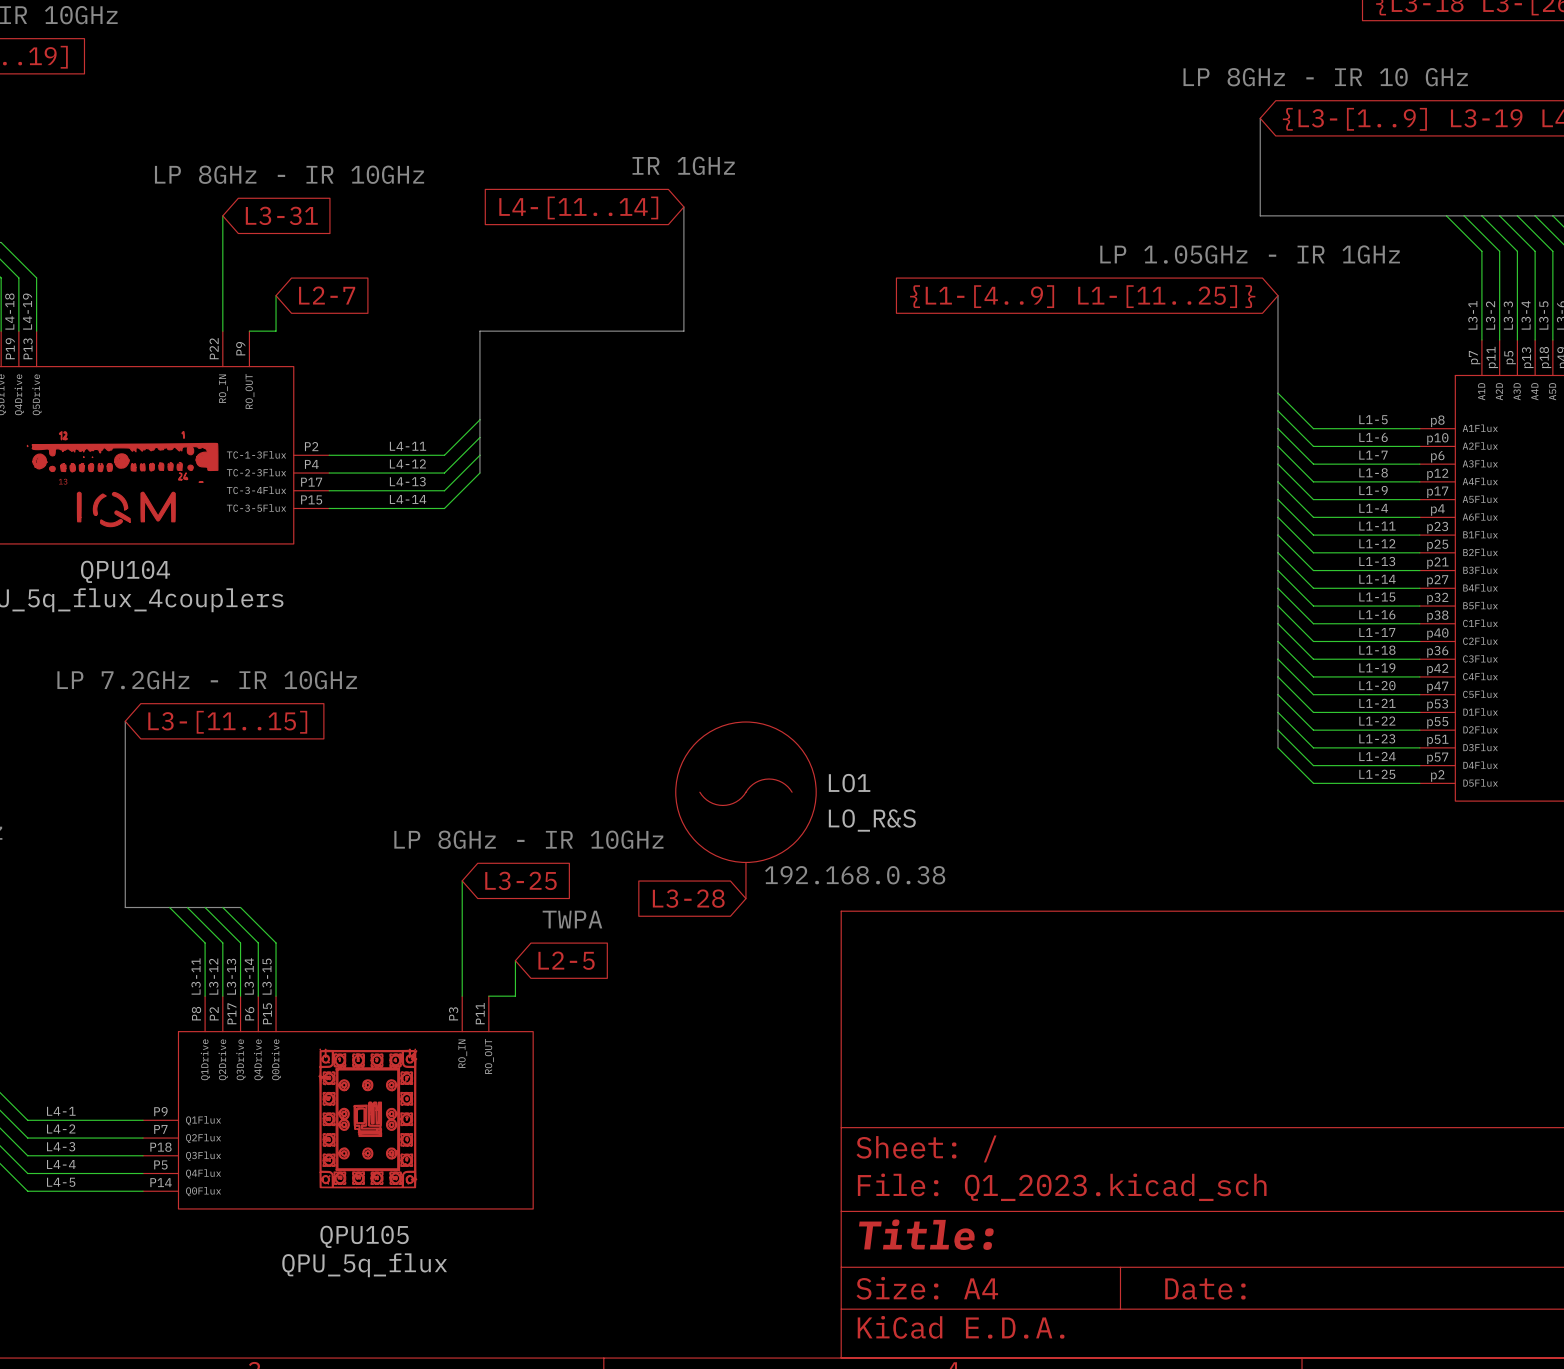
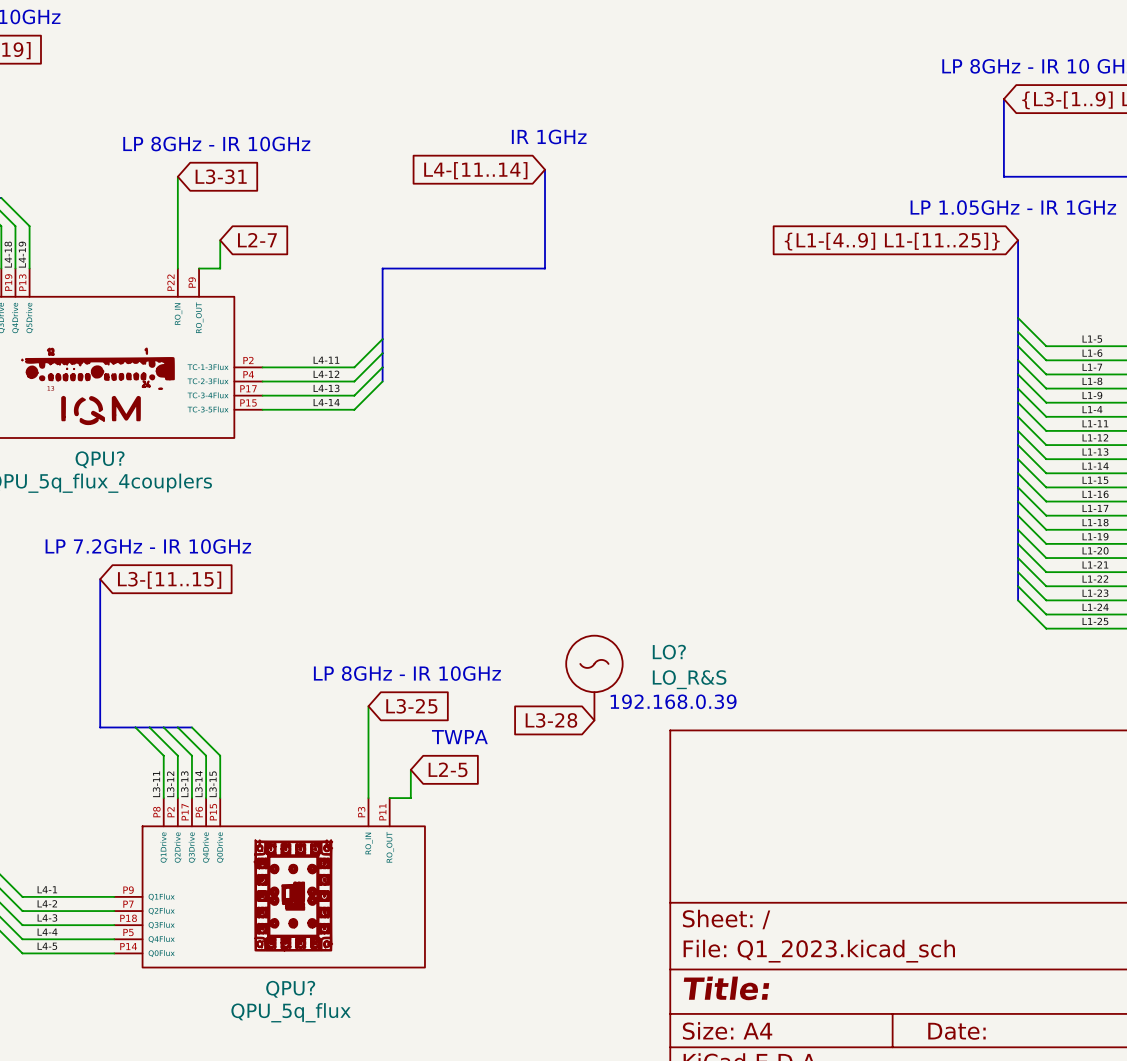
QPU104 name: QPU104 (125, 571) -> QPU? (100, 459)
LO1: LO_R&S (745, 810) -> none
LO?: none -> LO_R&S (594, 678)
text: 192.168.0.38 (855, 875) -> 192.168.0.39 (673, 701)
QPU105 name: QPU105 (364, 1236) -> QPU? (290, 989)

